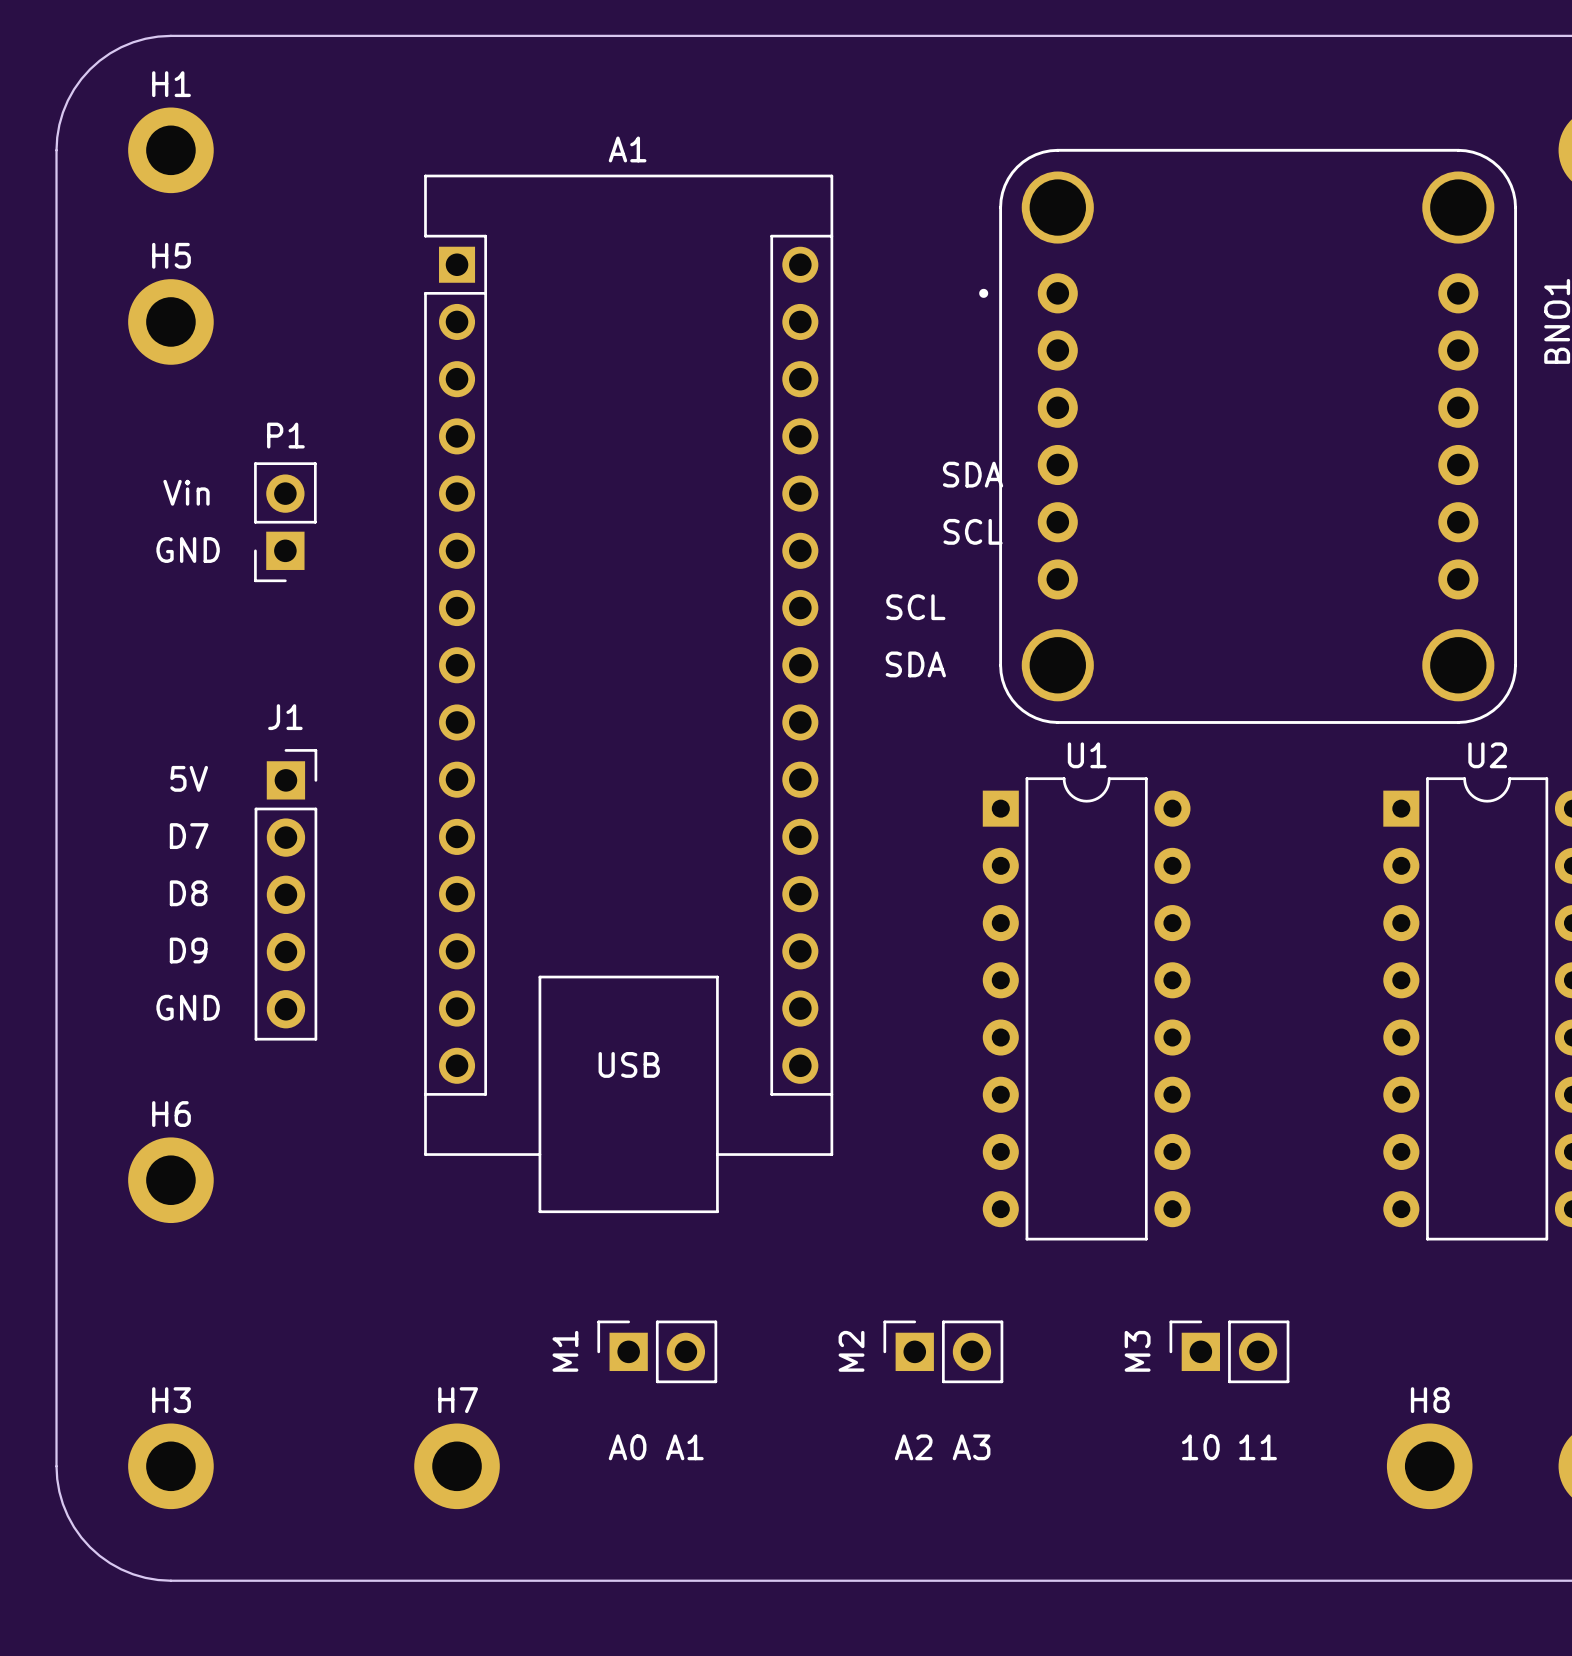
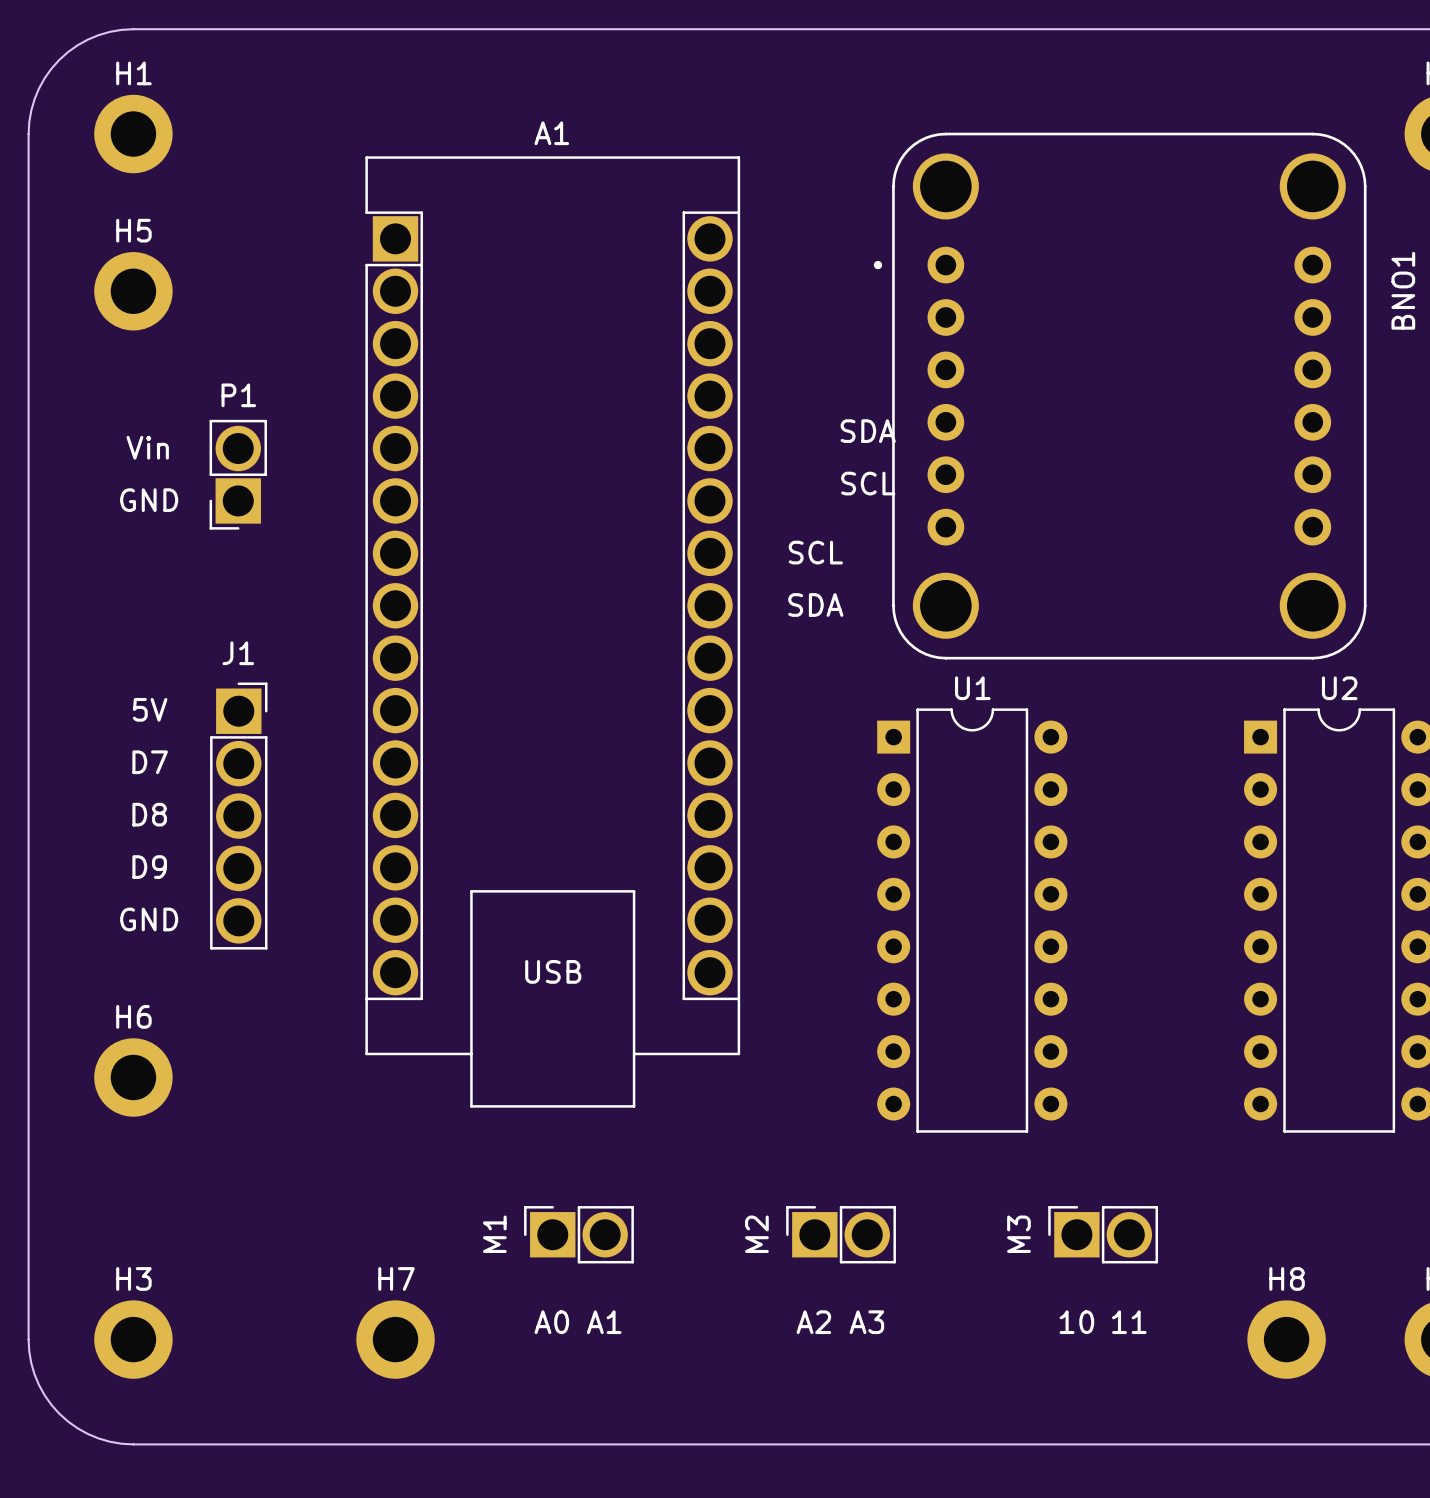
A1 footprint: [424, 174, 834, 1214] -> [365, 156, 741, 1108]
P1 footprint: [254, 462, 317, 583] -> [209, 419, 267, 530]
J1 footprint: [254, 749, 318, 1041] -> [210, 682, 268, 950]
M1 footprint: [597, 1320, 718, 1384] -> [524, 1206, 634, 1264]
M2 footprint: [883, 1320, 1004, 1384] -> [786, 1206, 896, 1264]
M3 footprint: [1169, 1320, 1290, 1384] -> [1048, 1206, 1159, 1264]

